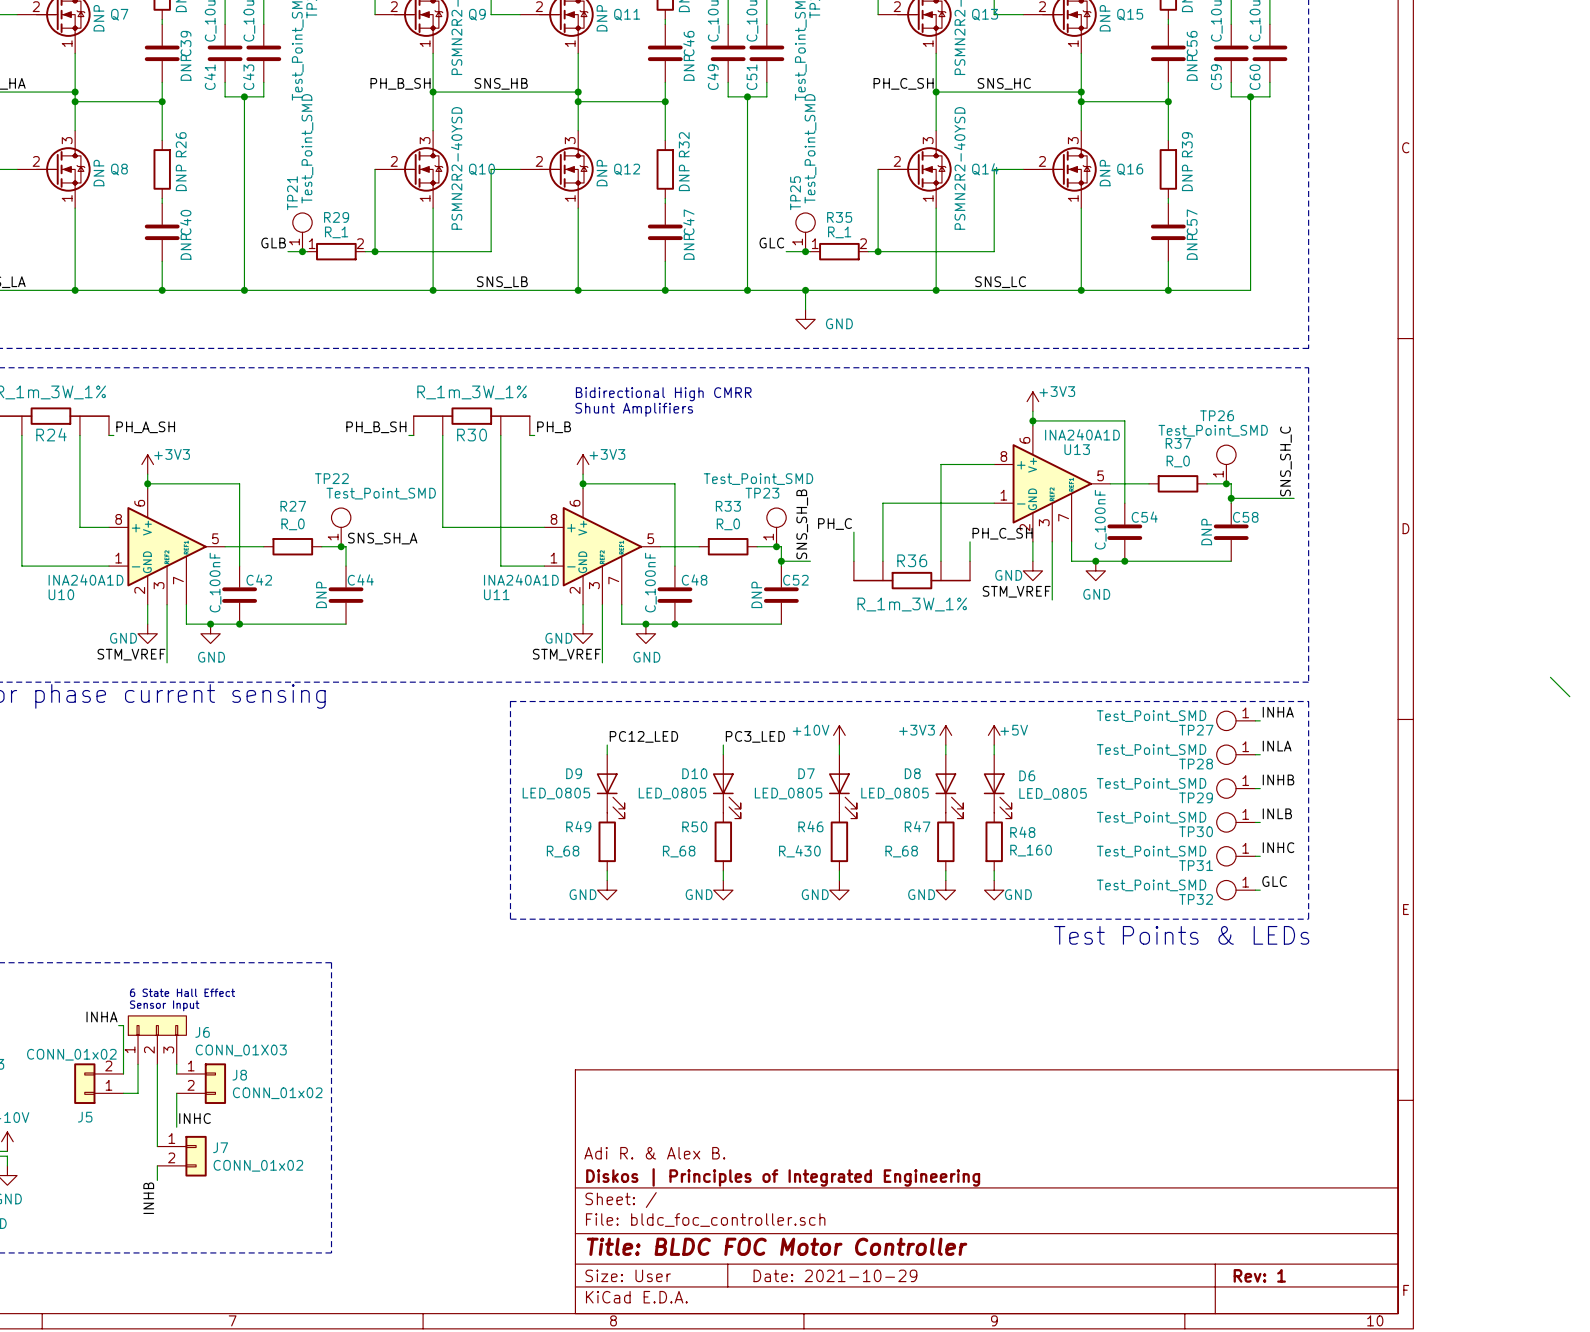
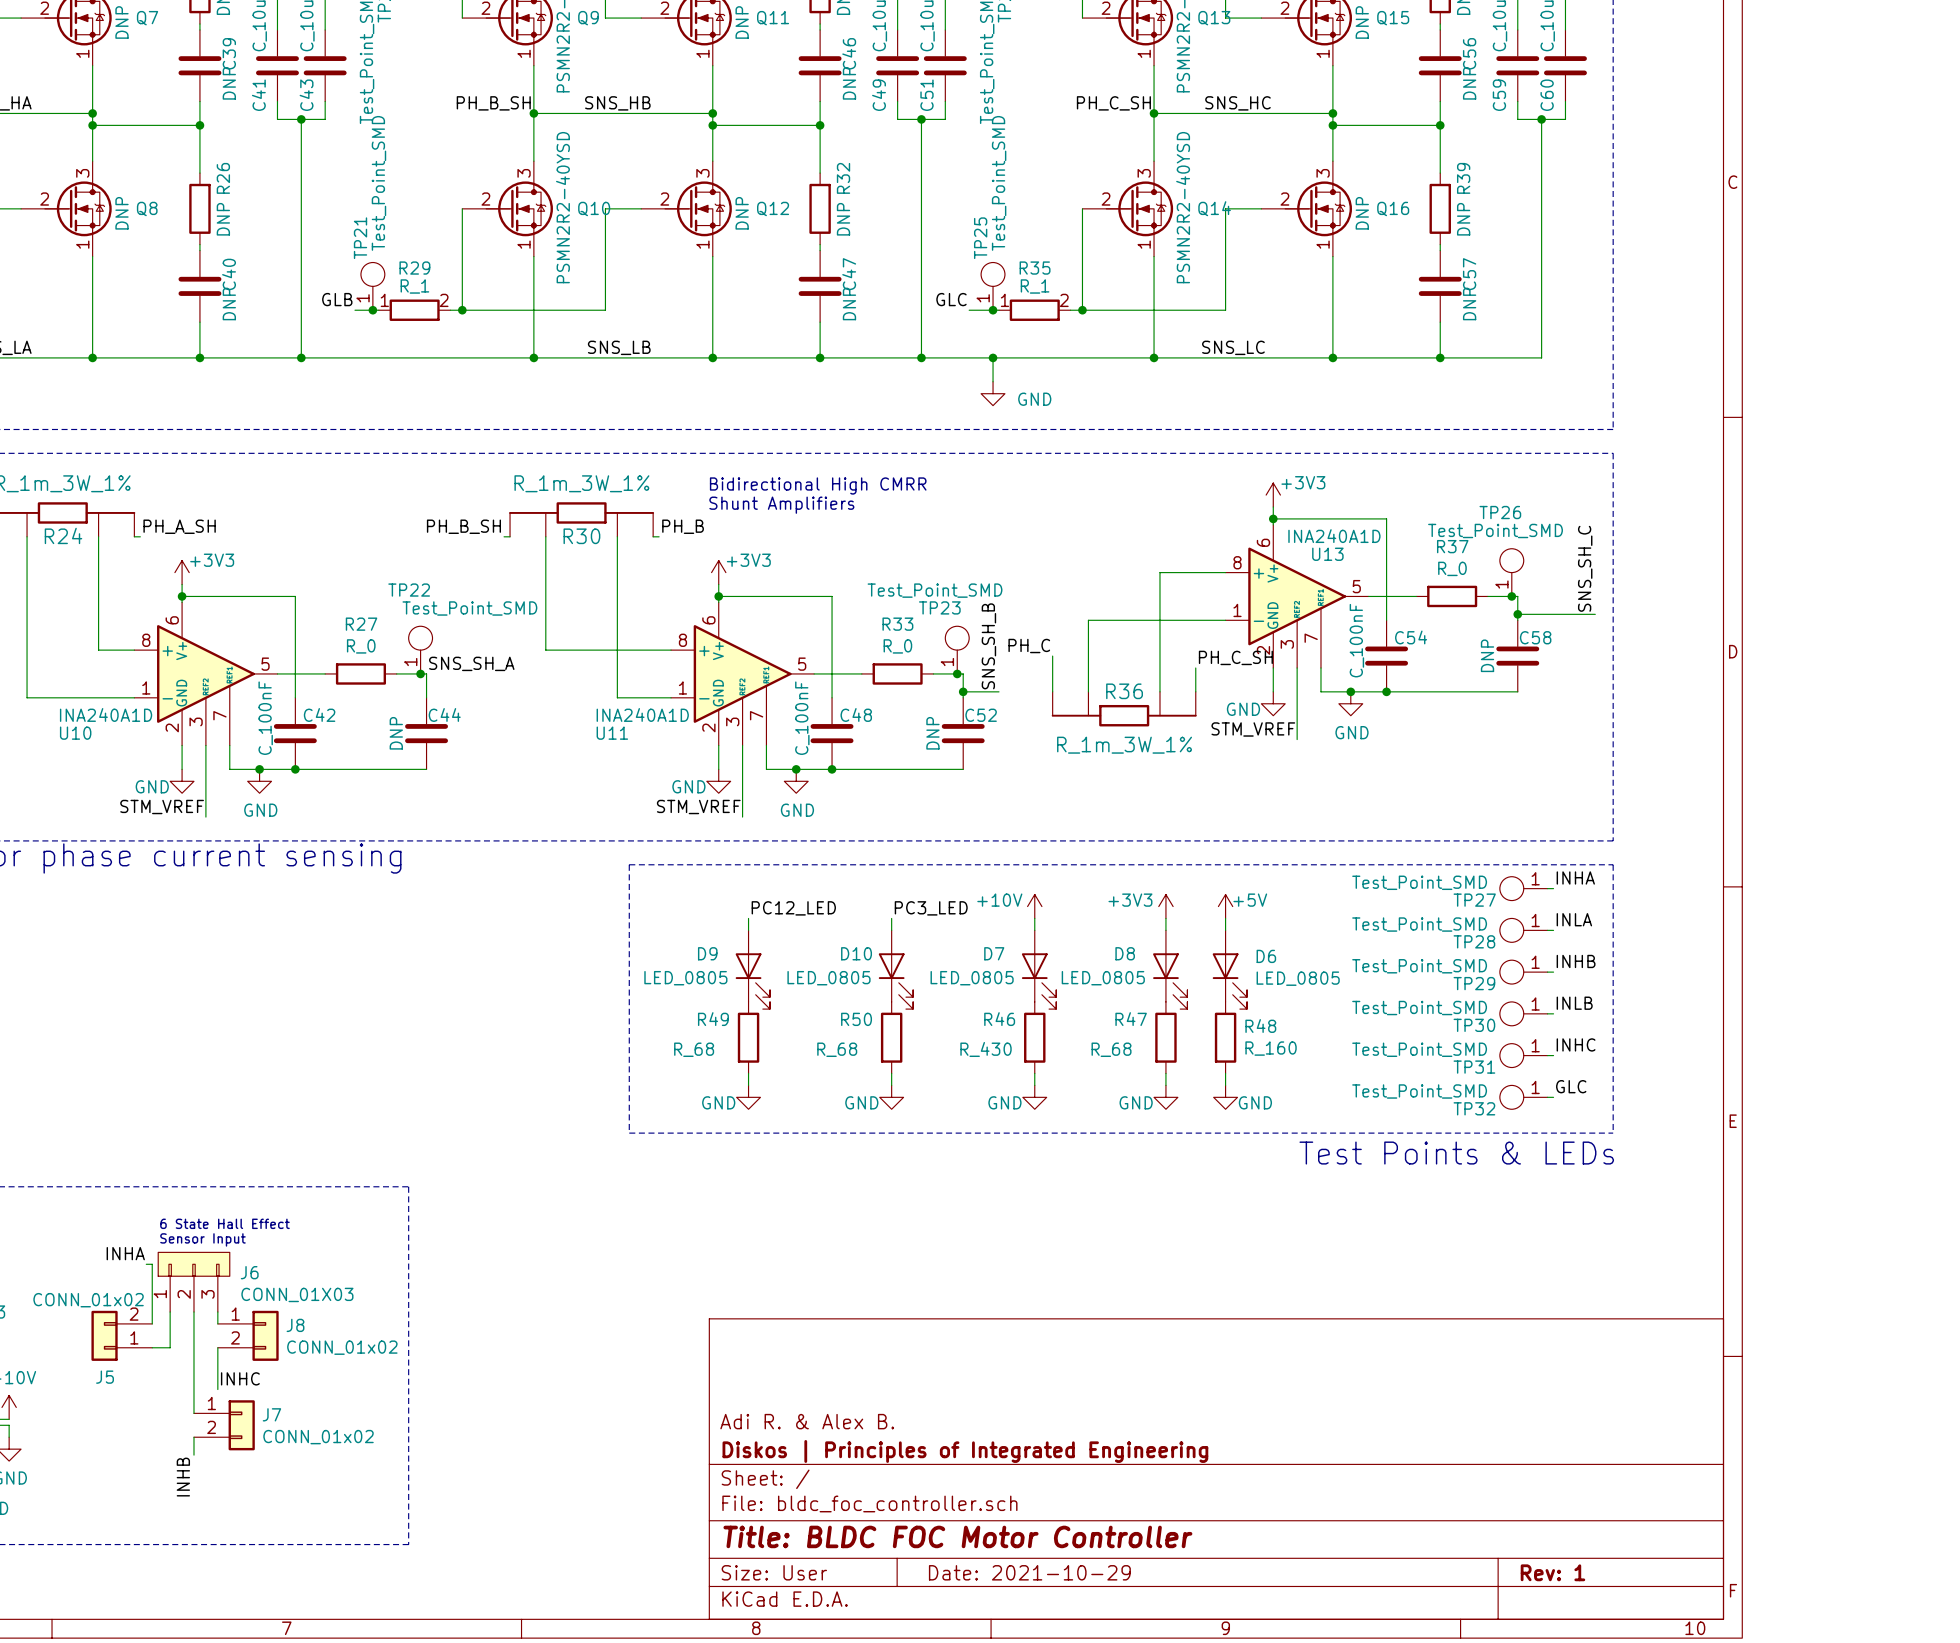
wire: (1550, 677) (1569, 696) -> none

